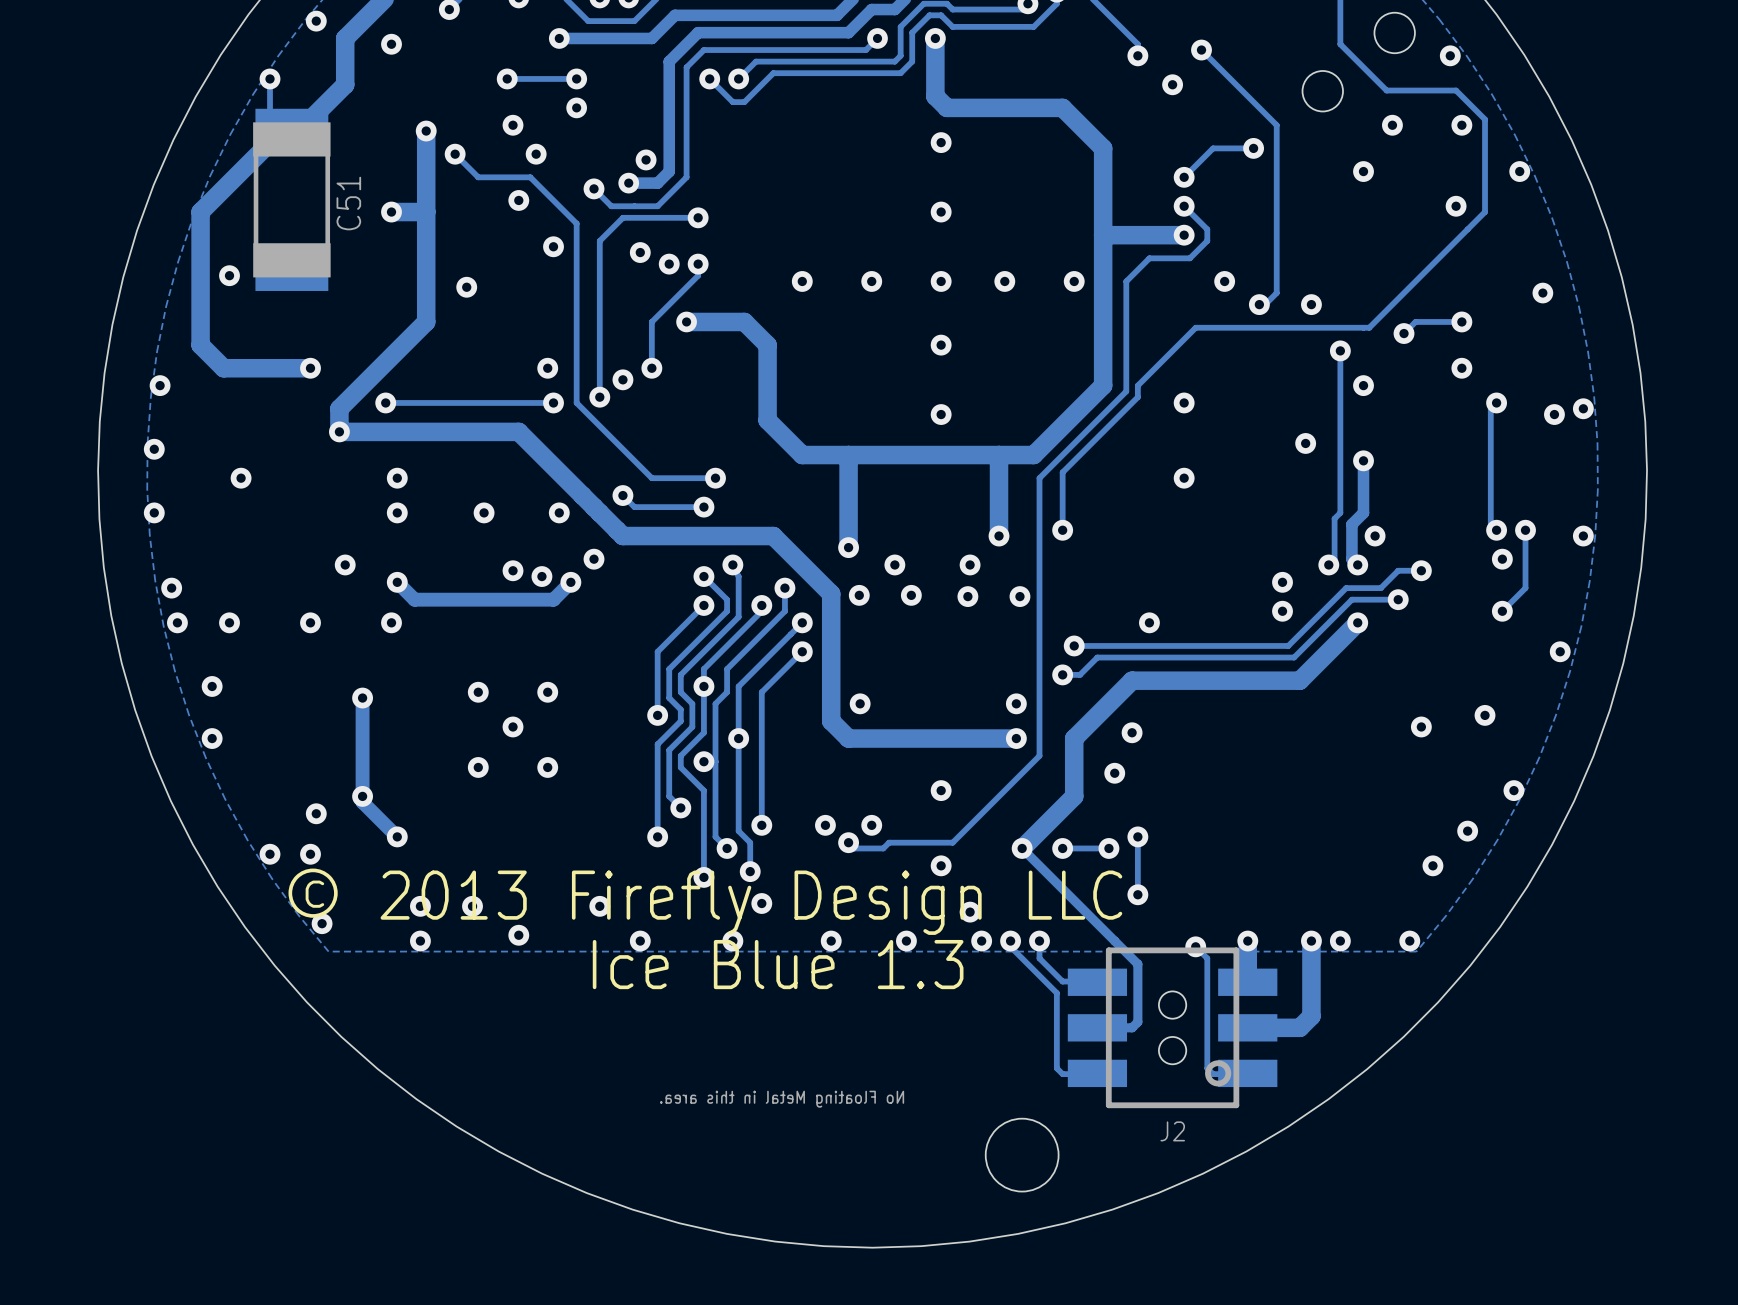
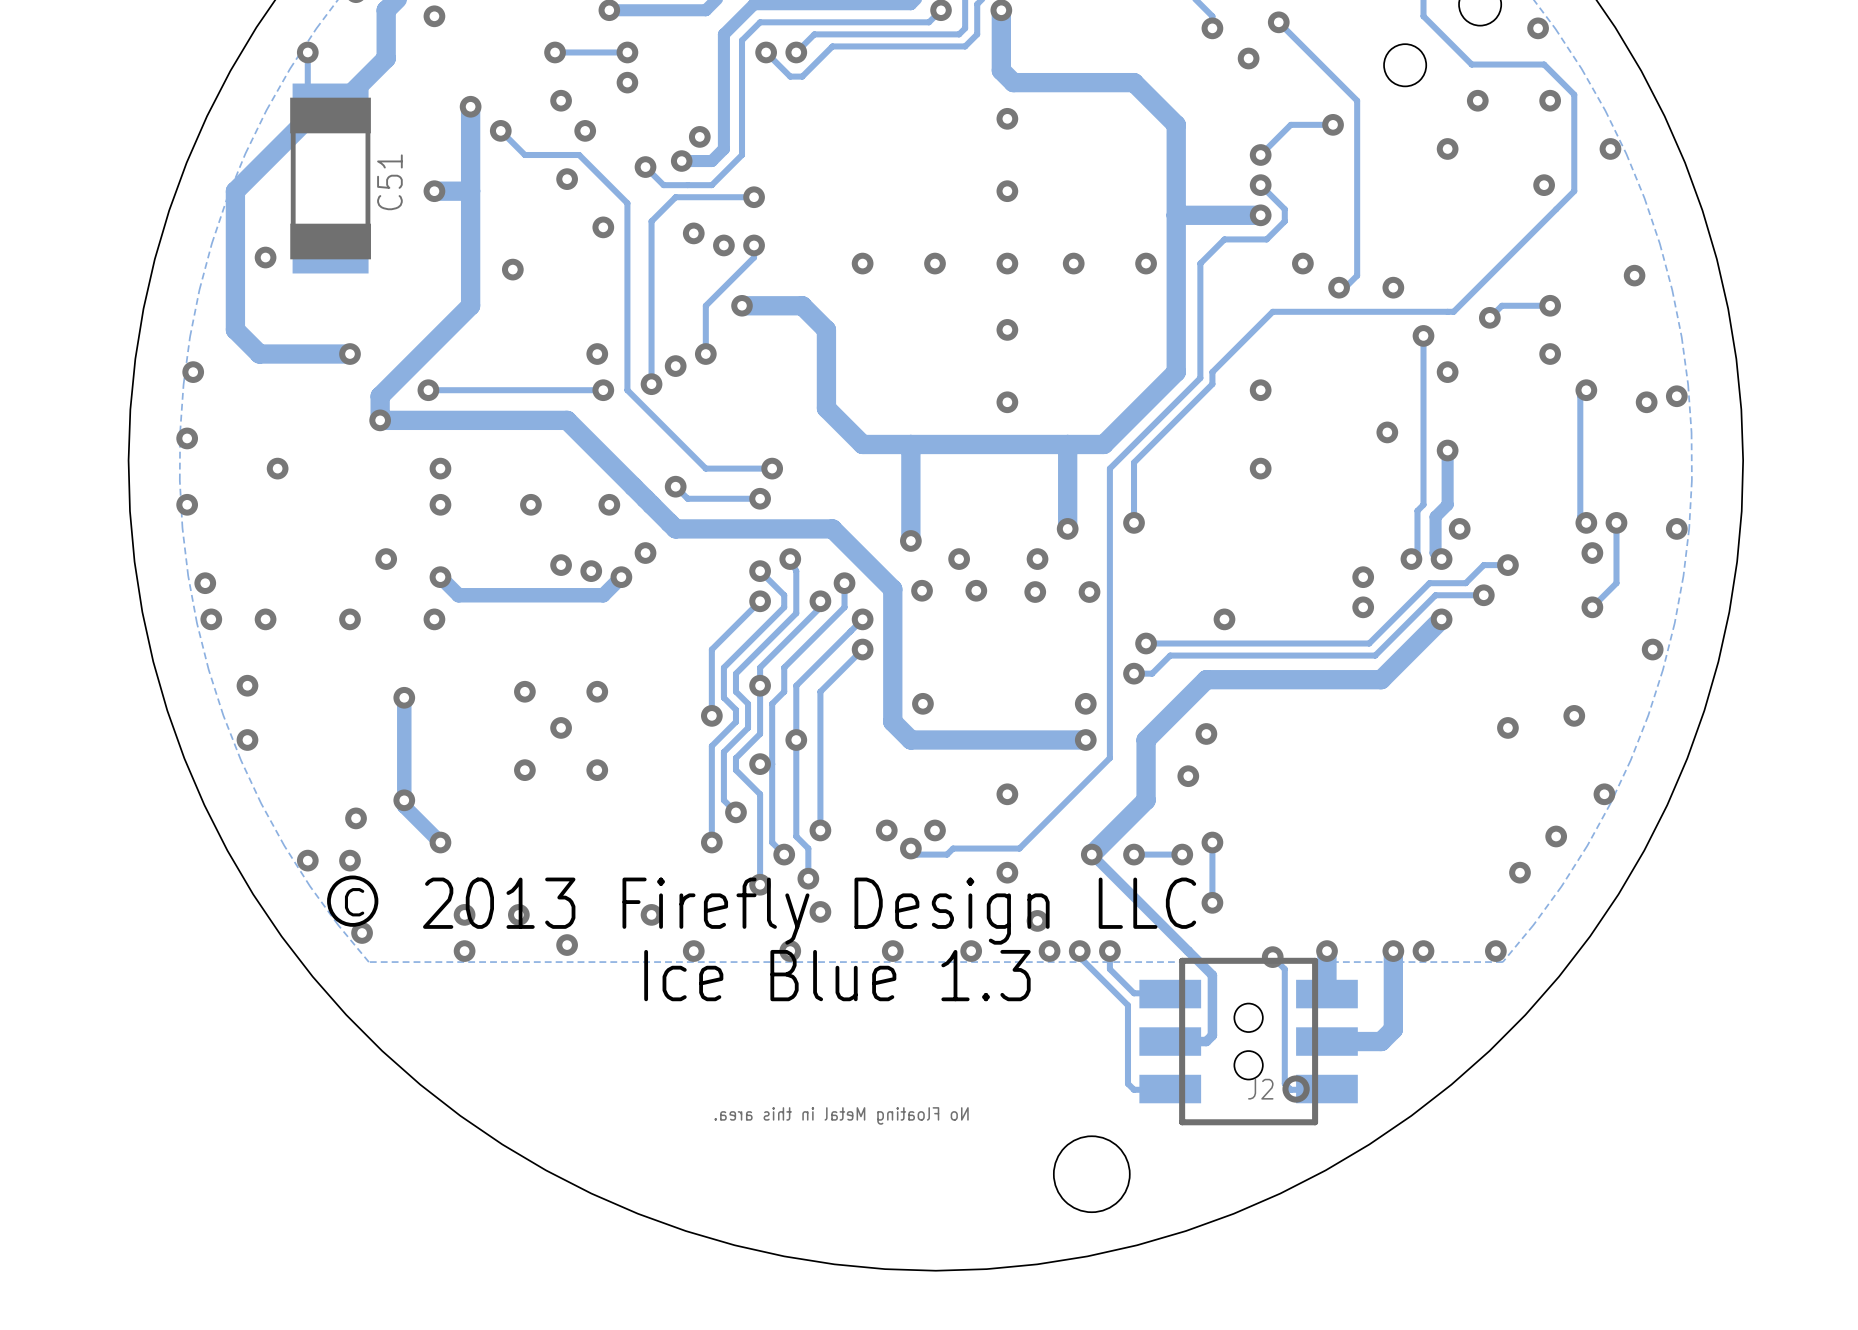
J2 name position: J2 (1172, 1131) -> J2 (1260, 1089)

